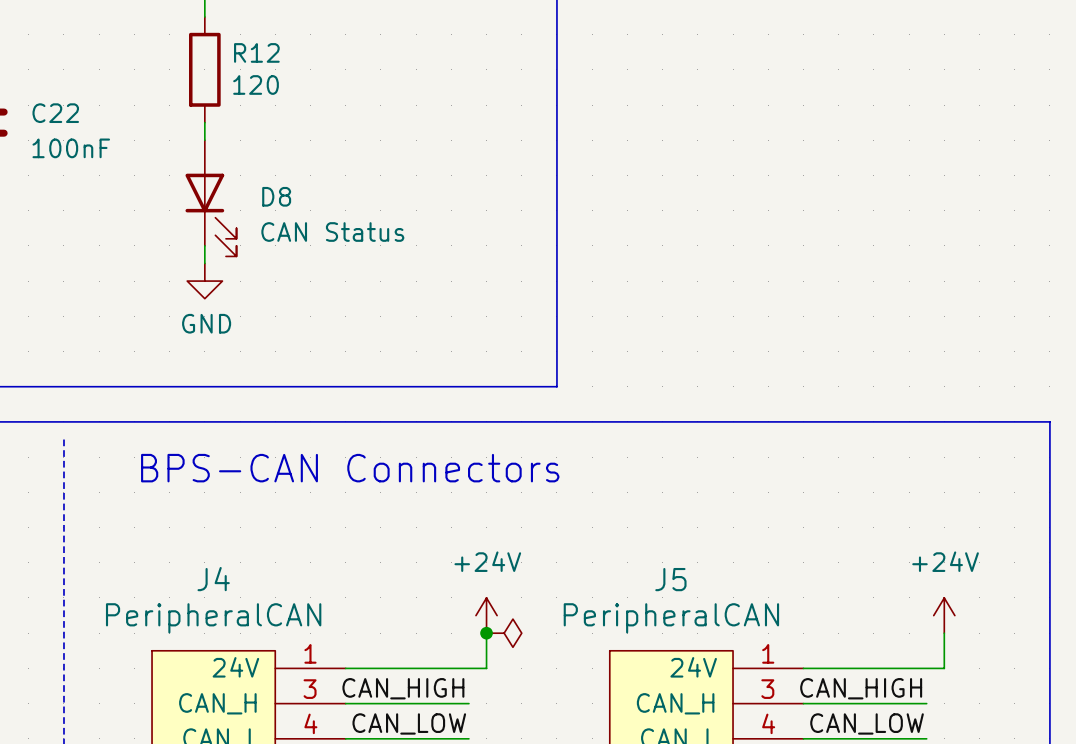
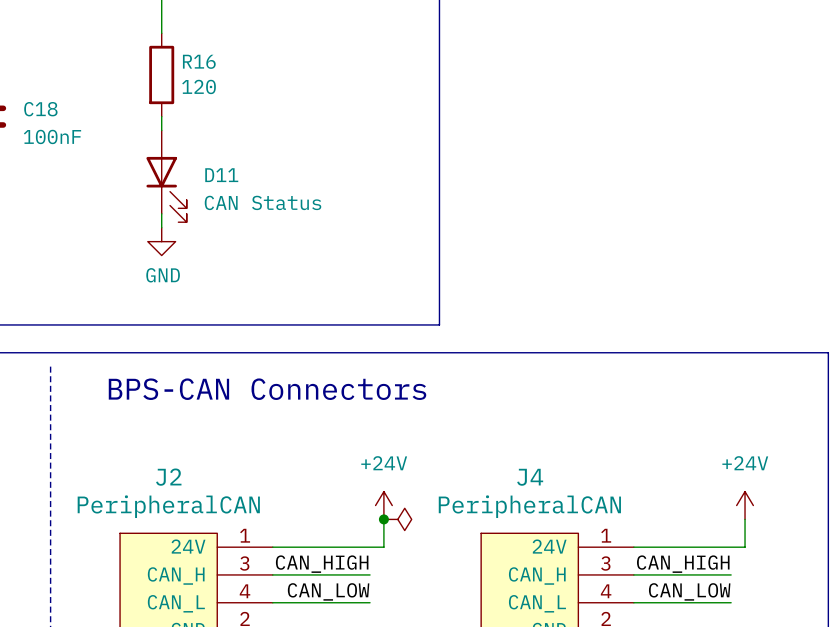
R12 name: R12 (256, 52) -> R16 (199, 61)
C22 name: C22 (55, 113) -> C18 (40, 109)
D8 name: D8 (276, 196) -> D11 (221, 175)
J4 name: J4 (213, 579) -> J2 (168, 477)
J5 name: J5 (670, 579) -> J4 (530, 477)

